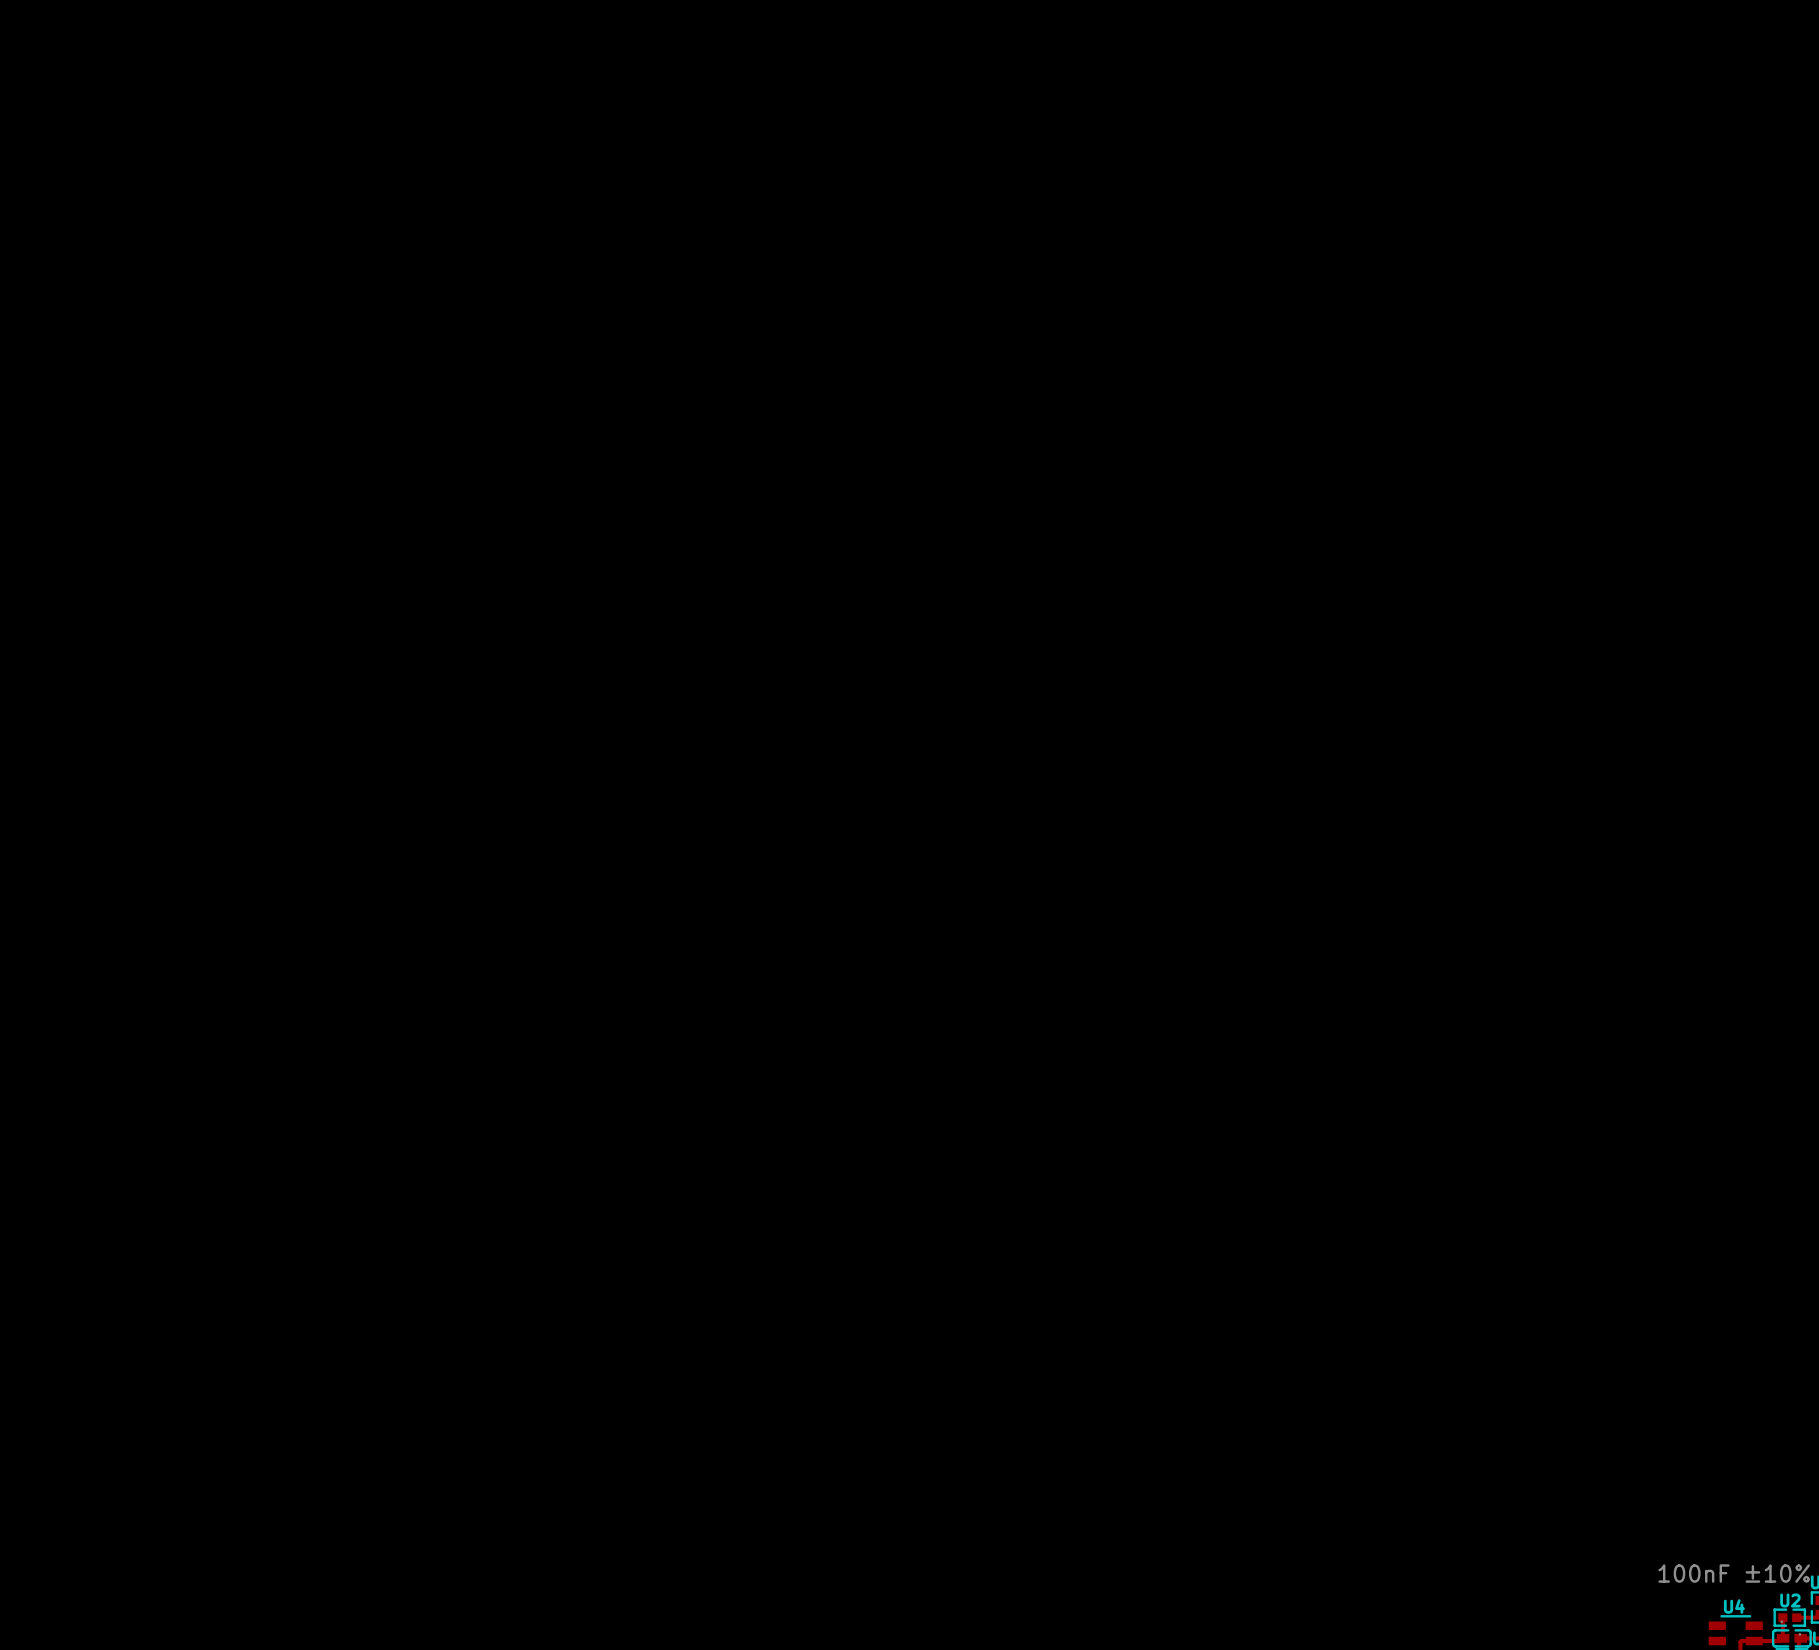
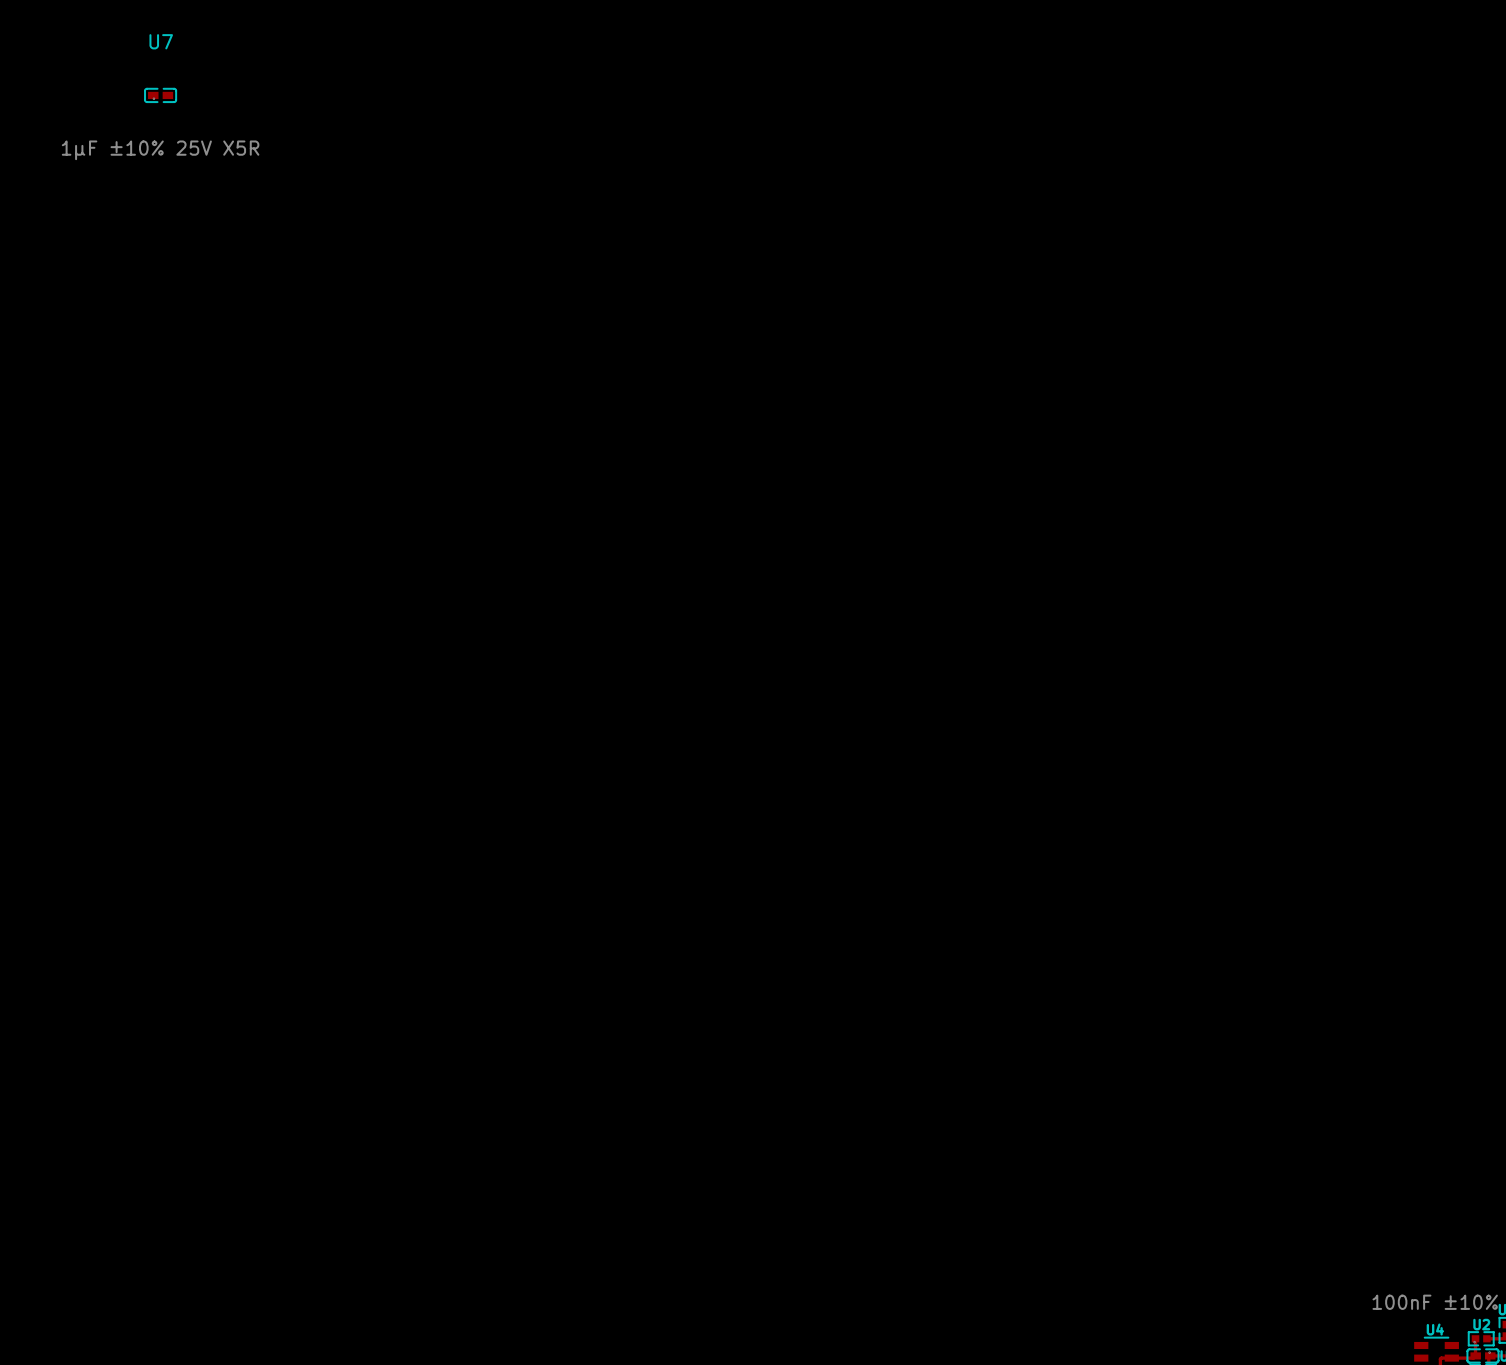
U7: none -> 1µF ±10% 25V X5R (160, 95)

